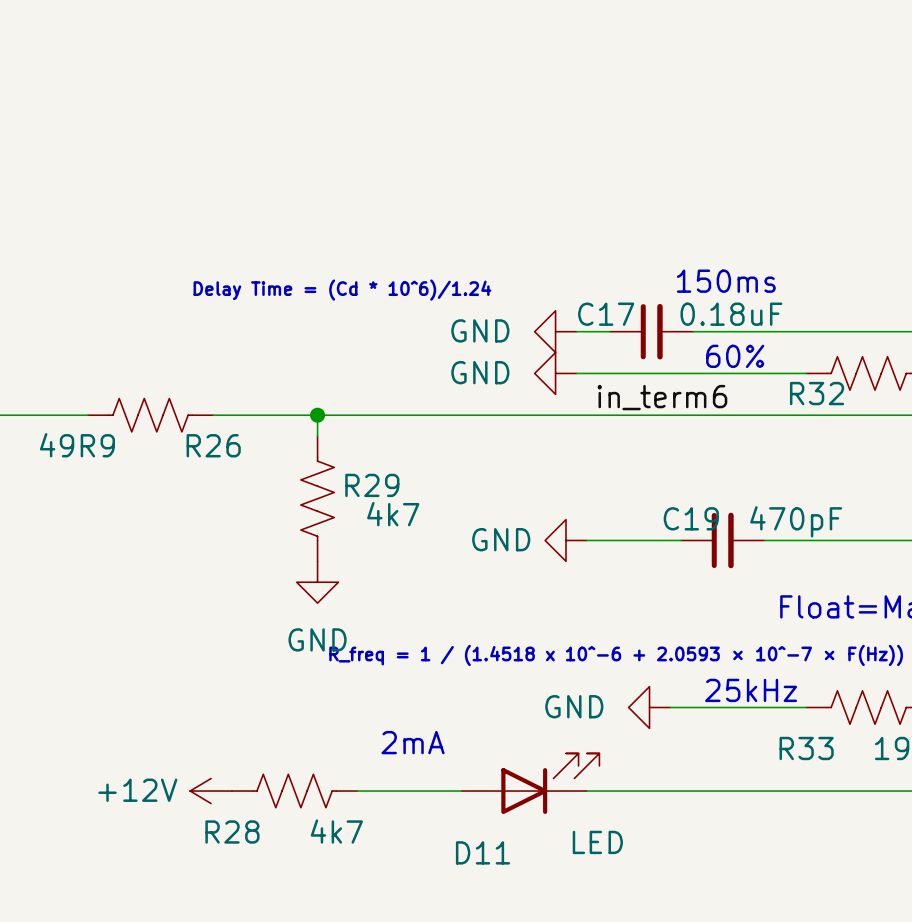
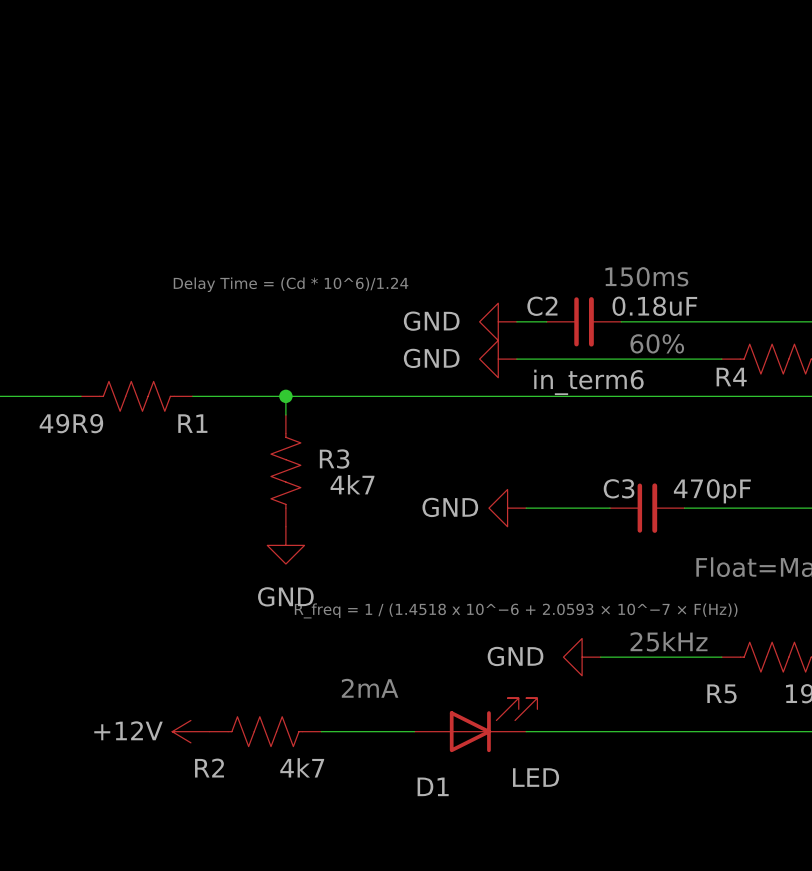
C17 name: C17 (606, 314) -> C2 (542, 306)
R32 name: R32 (817, 393) -> R4 (731, 377)
R26 name: R26 (213, 445) -> R1 (192, 423)
R29 name: R29 (372, 485) -> R3 (334, 459)
C19 name: C19 (691, 518) -> C3 (619, 488)
R33 name: R33 (806, 748) -> R5 (721, 693)
R28 name: R28 (232, 832) -> R2 (209, 768)
D11 name: D11 (482, 852) -> D1 (433, 786)

